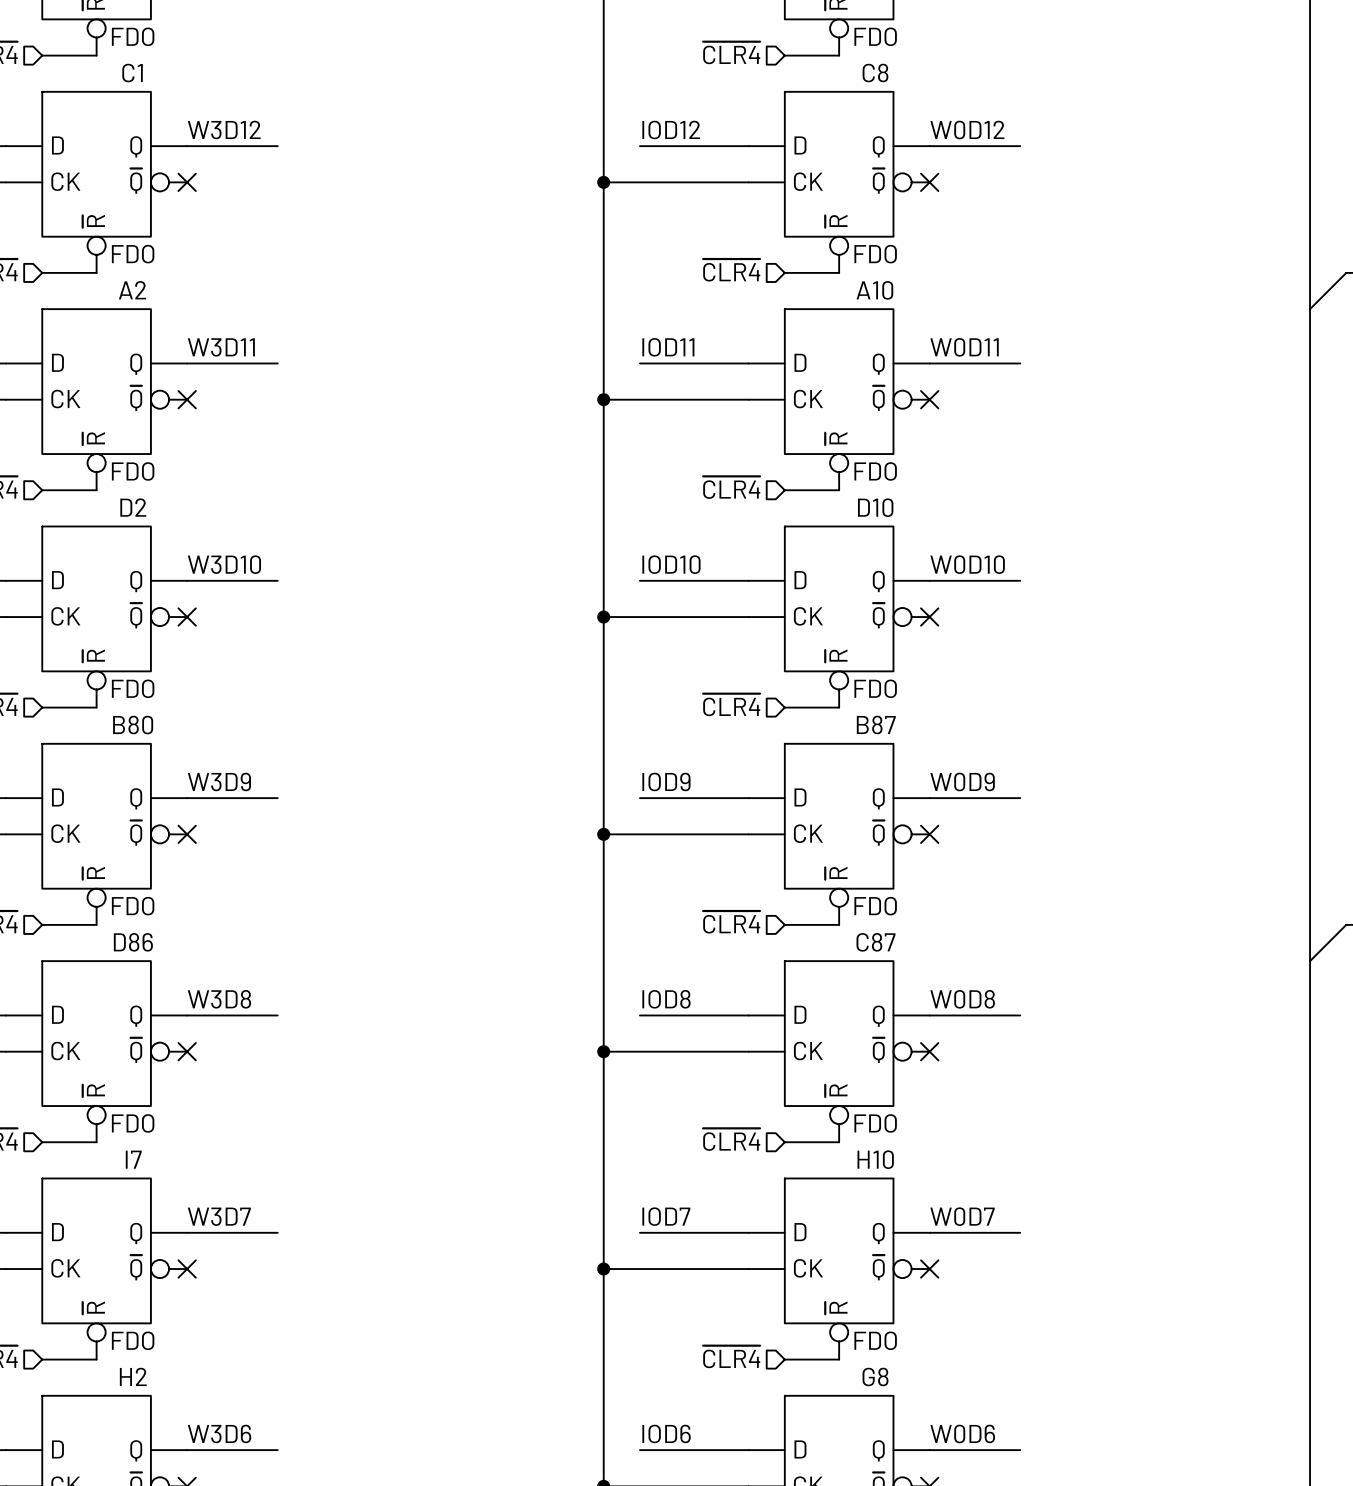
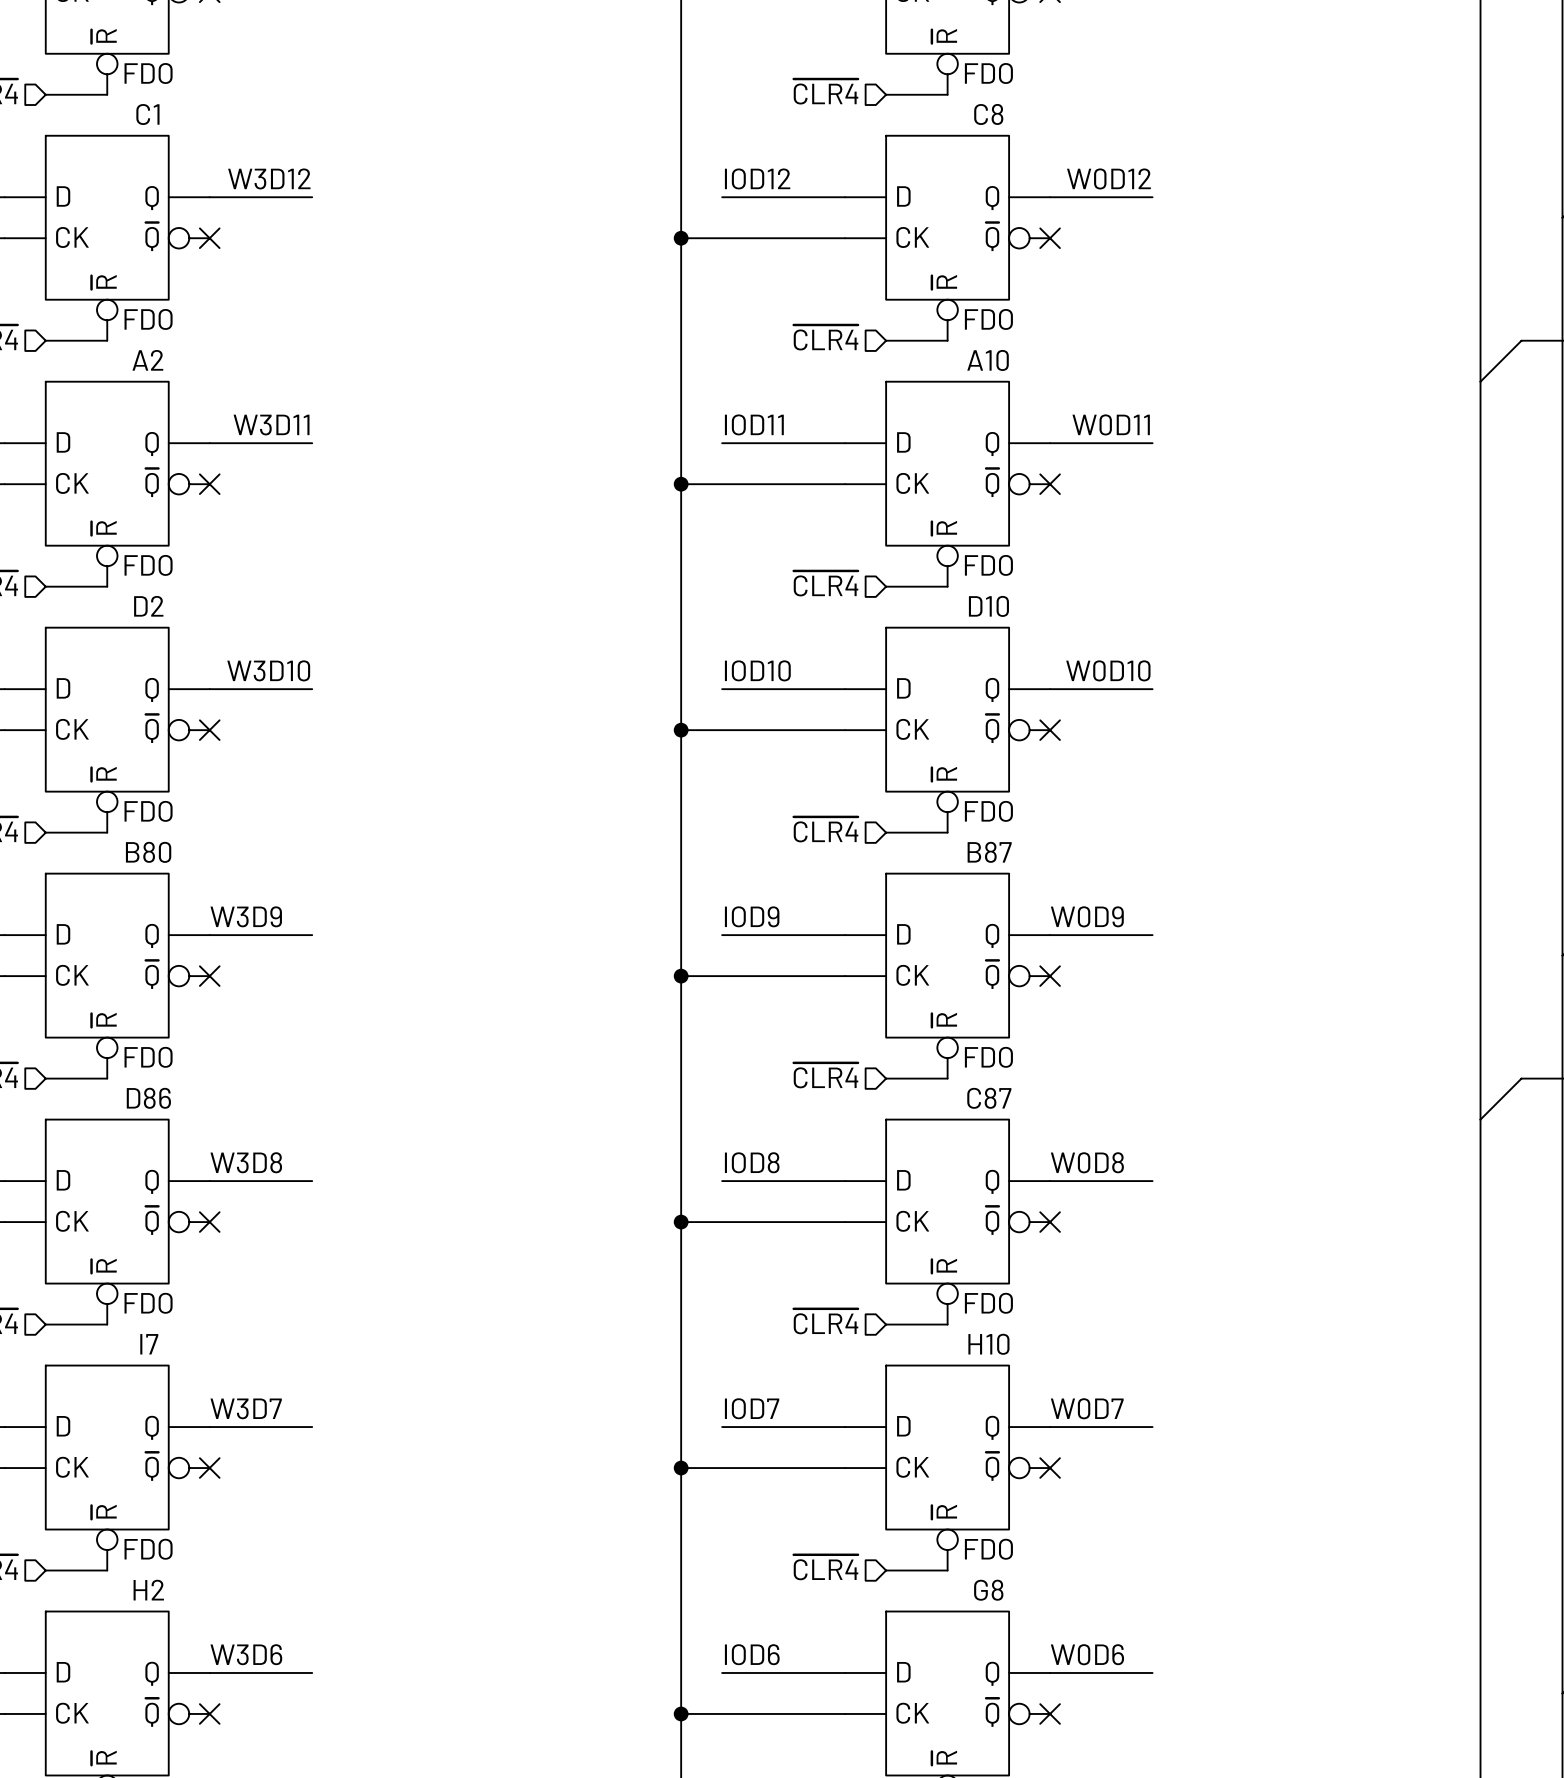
label position: W3D12 (224, 129) -> W3D12 (269, 178)
label position: W0D12 (967, 130) -> W0D12 (1108, 178)
label position: W3D11 (221, 347) -> W3D11 (271, 425)
label position: W0D11 (964, 347) -> W0D11 (1111, 424)
label position: W3D10 (224, 564) -> W3D10 (268, 670)
label position: W0D10 (967, 564) -> W0D10 (1108, 670)

